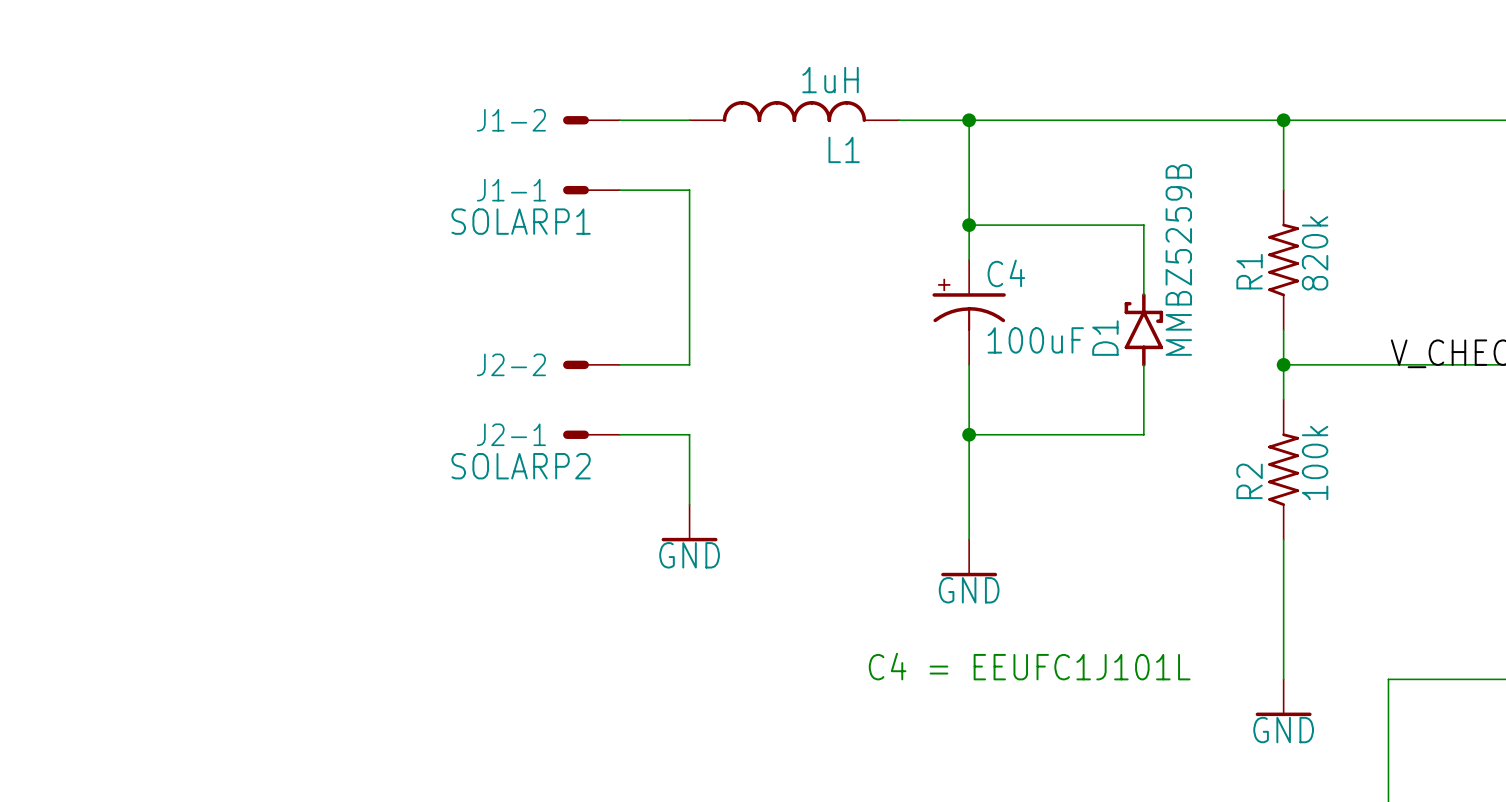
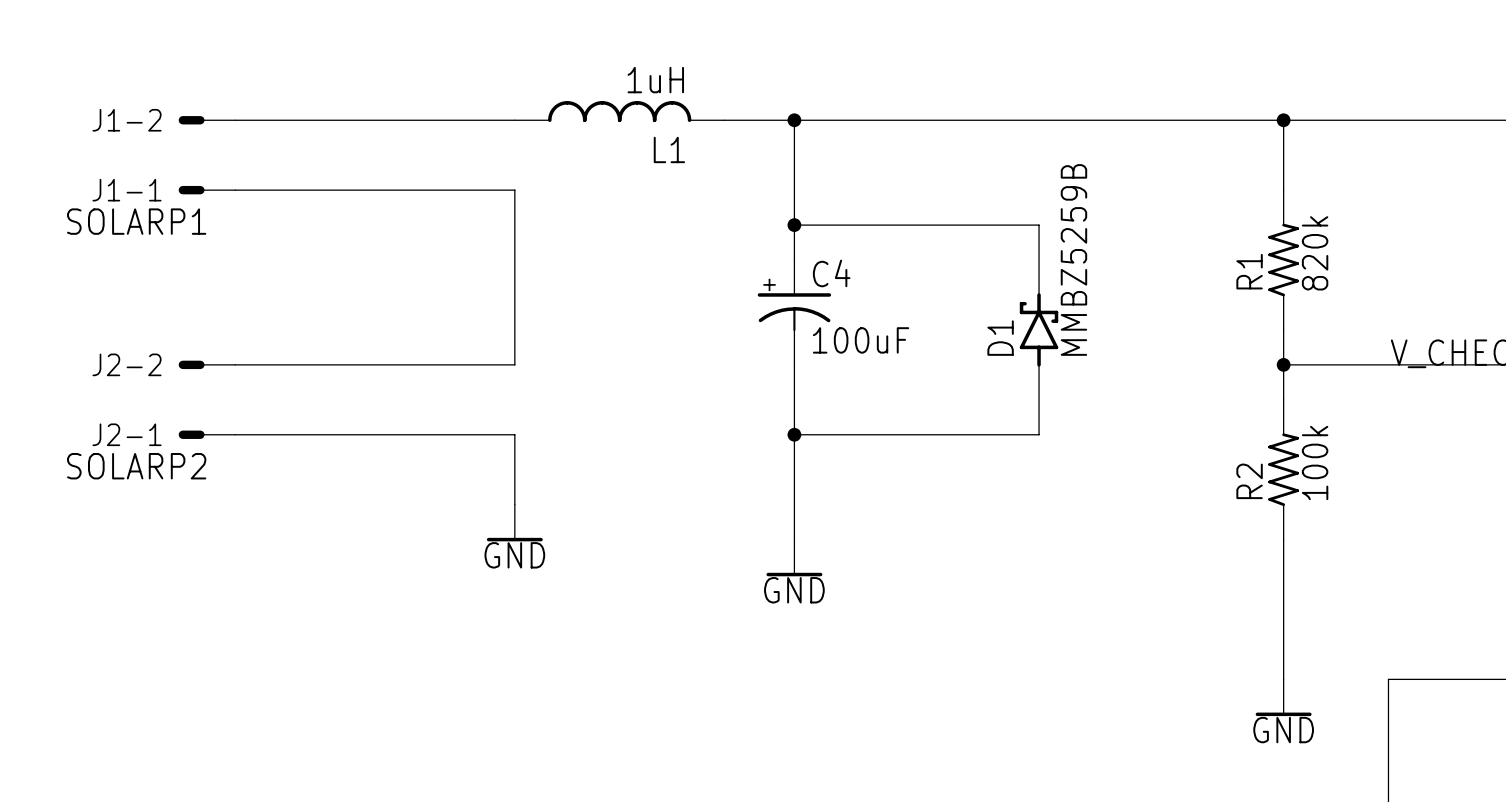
L1 position: (794, 111) -> (619, 111)
wire: none -> (235, 120) (514, 120)
J1-2 position: (591, 120) -> (206, 120)
wire: (619, 120) (689, 120) -> none
wire: none -> (724, 120) (899, 120)
junction: none -> (794, 120)
wire: (969, 120) (969, 260) -> (794, 120) (794, 260)
junction: (969, 120) -> none
wire: none -> (235, 190) (514, 190) (514, 364) (235, 364)
J1-1 position: (591, 190) -> (206, 190)
wire: (619, 190) (689, 190) (689, 364) (619, 364) -> none
wire: none -> (794, 225) (969, 225)
junction: none -> (794, 225)
junction: (969, 225) -> none
wire: (1039, 225) (1143, 225) (1143, 294) -> (1039, 225) (1039, 294)
C4 position: (969, 312) -> (794, 312)
D1 position: (1143, 329) -> (1039, 329)
J2-2 position: (591, 364) -> (206, 364)
wire: (969, 364) (969, 539) -> (794, 364) (794, 539)
wire: (1143, 364) (1143, 434) (1039, 434) -> (1039, 364) (1039, 434)
wire: none -> (235, 434) (514, 434) (514, 504)
J2-1 position: (591, 434) -> (206, 434)
wire: (619, 434) (689, 434) (689, 504) -> none
wire: none -> (794, 434) (969, 434)
junction: none -> (794, 434)
junction: (969, 434) -> none
power symbol: none -> GND (514, 523)
power symbol: GND (689, 523) -> none
power symbol: none -> GND (794, 557)
power symbol: GND (969, 557) -> none
text: C4 = EEUFC1J101L (1029, 666) -> none

